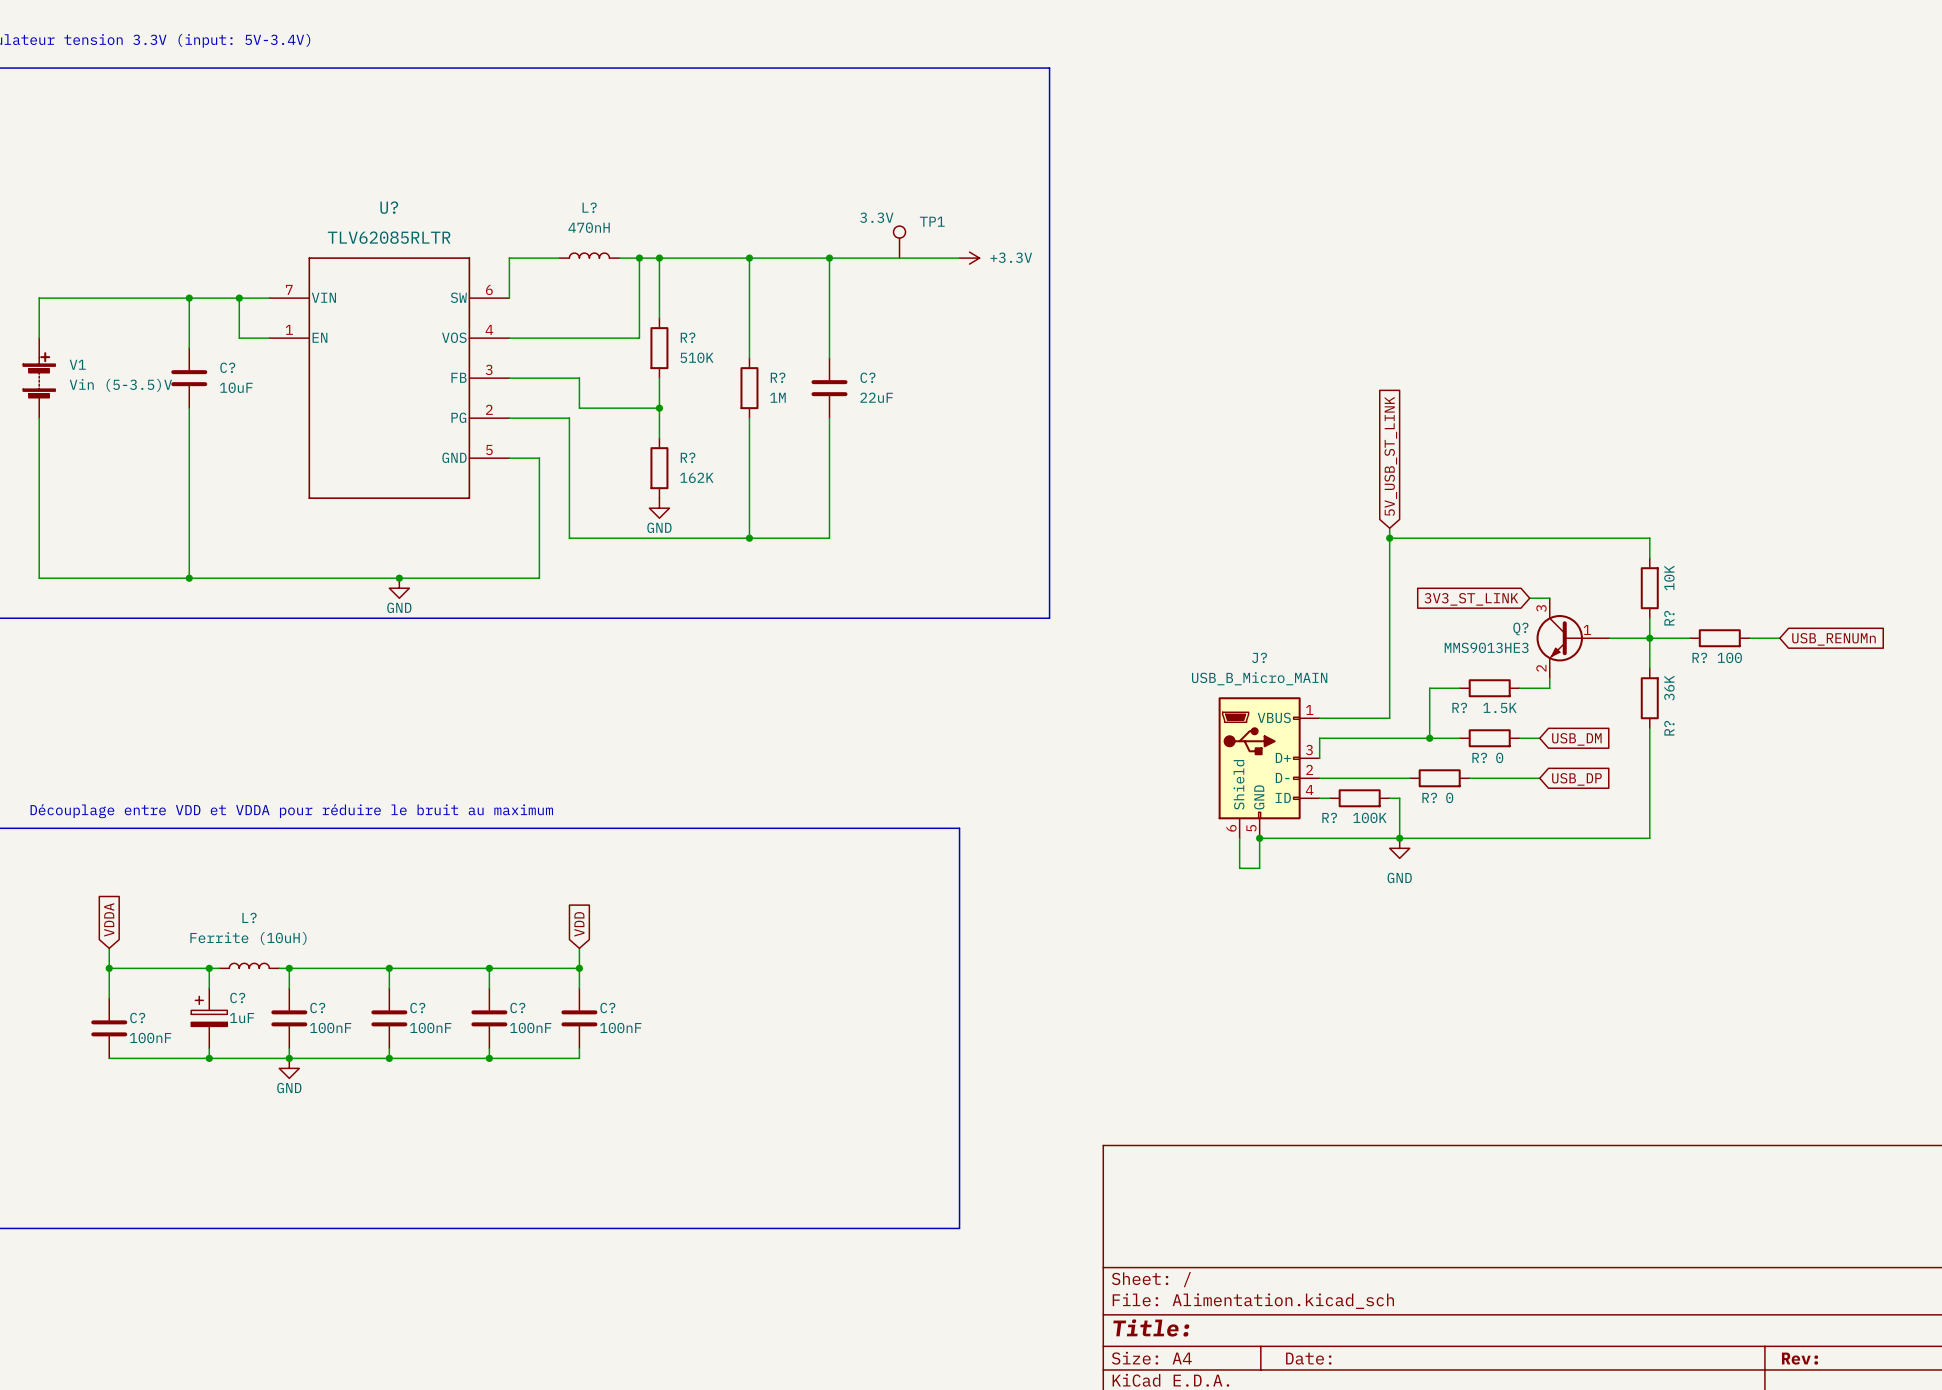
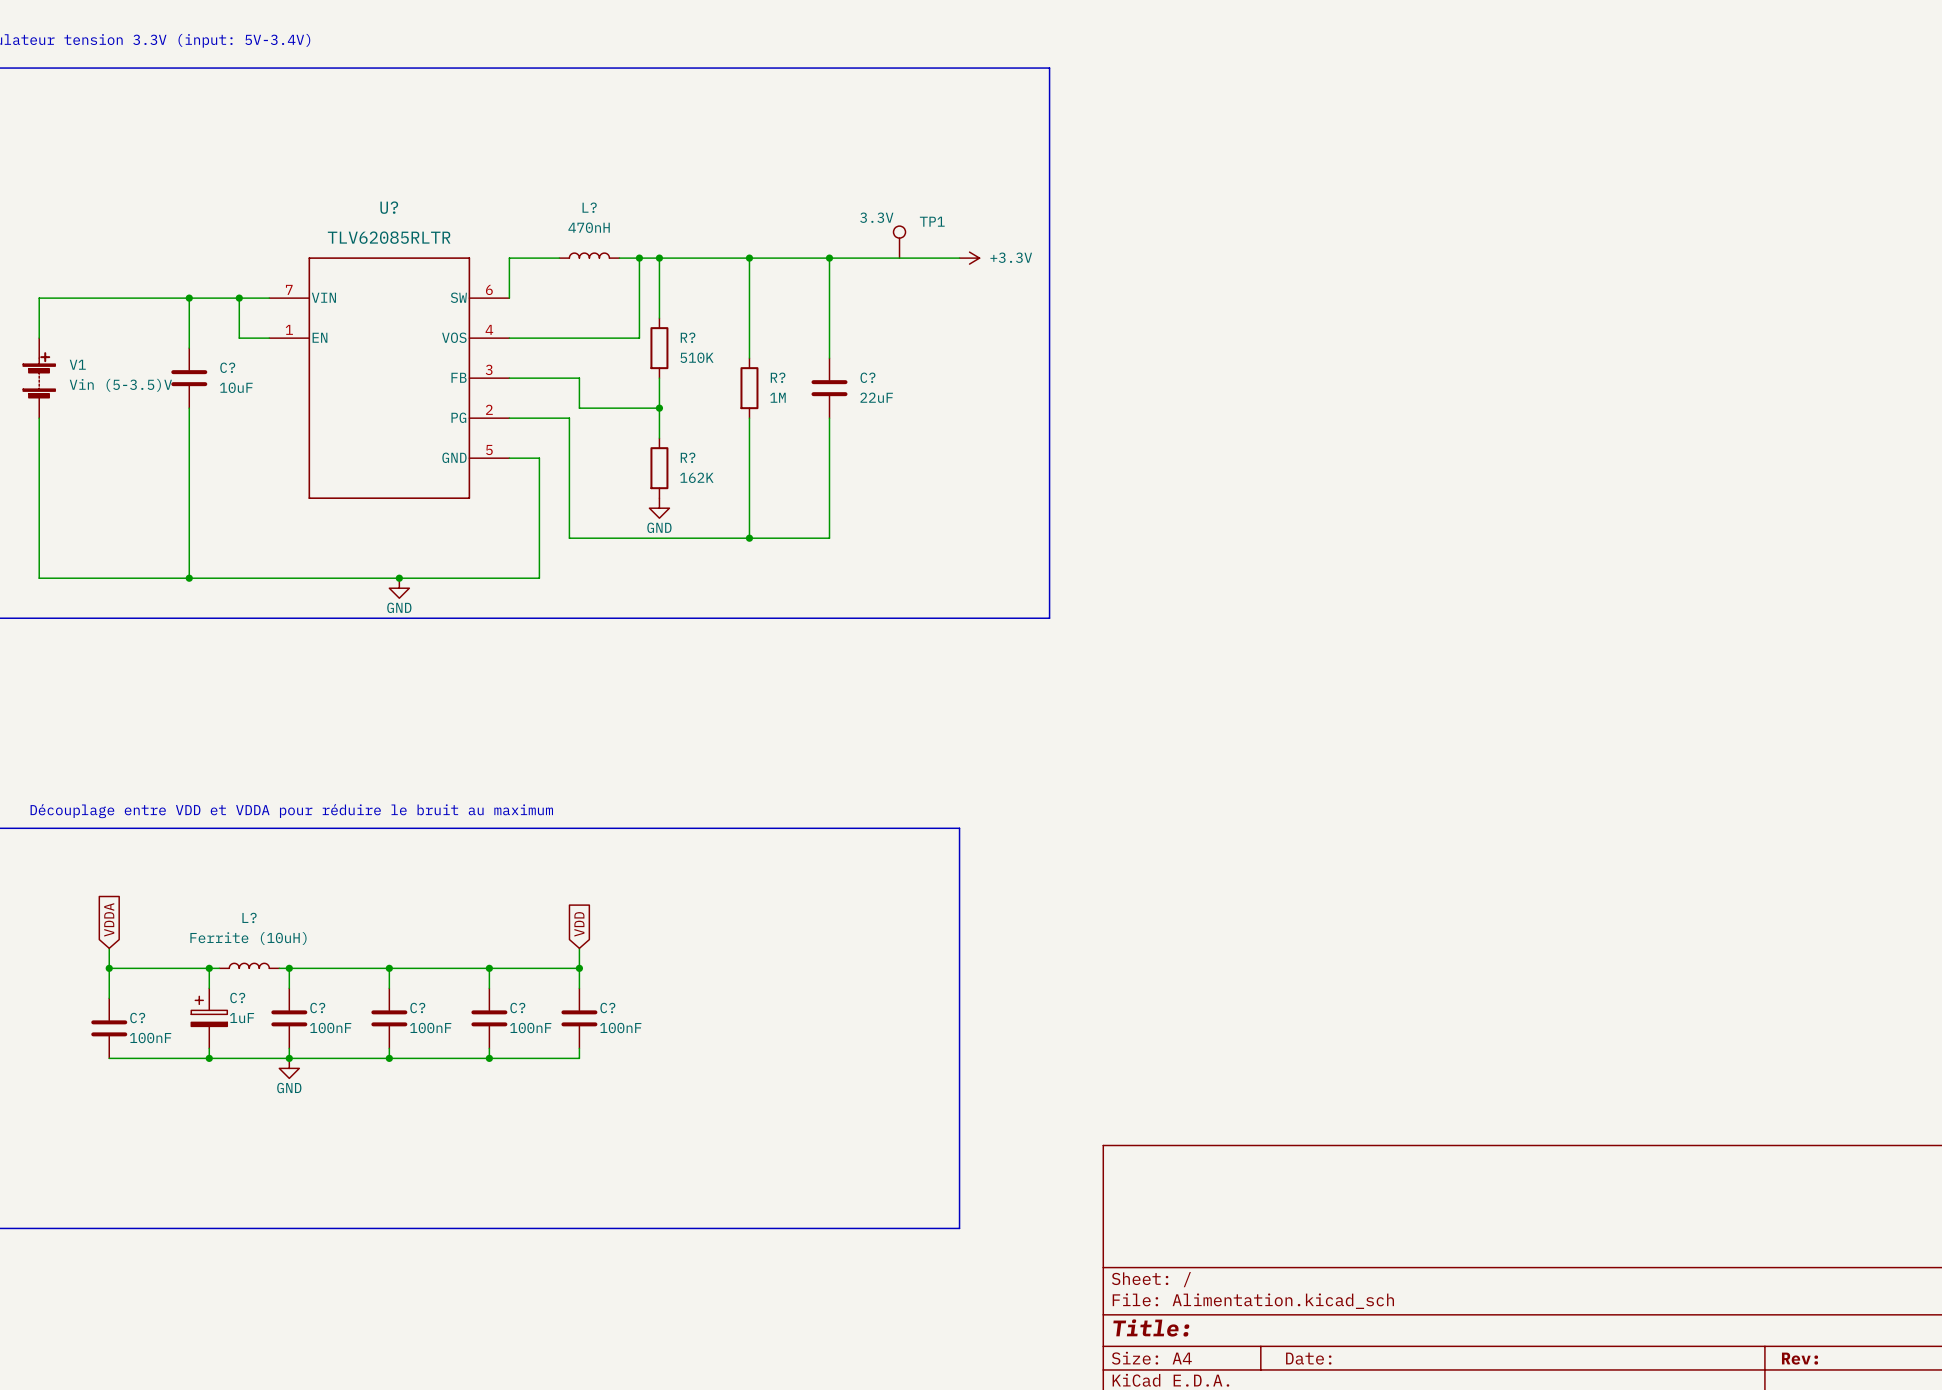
global label: 5V_USB_ST_LINK (1390, 456) -> none
wire: (1389, 528) (1389, 718) (1319, 718) -> none
wire: (1389, 538) (1649, 538) (1649, 558) -> none
junction: (1389, 538) -> none
R?: 10K (1649, 588) -> none
wire: (1529, 598) (1549, 598) -> none
global label: 3V3_ST_LINK (1471, 599) -> none
wire: (1649, 618) (1649, 668) -> none
Q?: MMS9013HE3 (1573, 638) -> none
wire: (1609, 638) (1689, 638) -> none
junction: (1649, 638) -> none
R?: 100 (1719, 638) -> none
wire: (1749, 638) (1779, 638) -> none
global label: USB_RENUMn (1833, 639) -> none
wire: (1549, 678) (1549, 688) (1519, 688) -> none
wire: (1459, 688) (1429, 688) (1429, 738) -> none
R?: 1.5K (1489, 688) -> none
R?: 36K (1649, 698) -> none
wire: (1649, 728) (1649, 838) (1259, 838) (1259, 868) (1239, 868) (1239, 838) -> none
junction: (1429, 738) -> none
wire: (1459, 738) (1319, 738) (1319, 758) -> none
R?: 0 (1489, 738) -> none
wire: (1519, 738) (1539, 738) -> none
global label: USB_DM (1576, 739) -> none
J?: USB_B_Micro_MAIN (1269, 767) -> none
wire: (1319, 778) (1409, 778) -> none
R?: 0 (1439, 778) -> none
wire: (1469, 778) (1539, 778) -> none
global label: USB_DP (1576, 779) -> none
wire: (1319, 798) (1329, 798) -> none
R?: 100K (1359, 798) -> none
wire: (1389, 798) (1399, 798) (1399, 838) -> none
junction: (1259, 838) -> none
junction: (1399, 838) -> none
power symbol: GND (1399, 848) -> none

